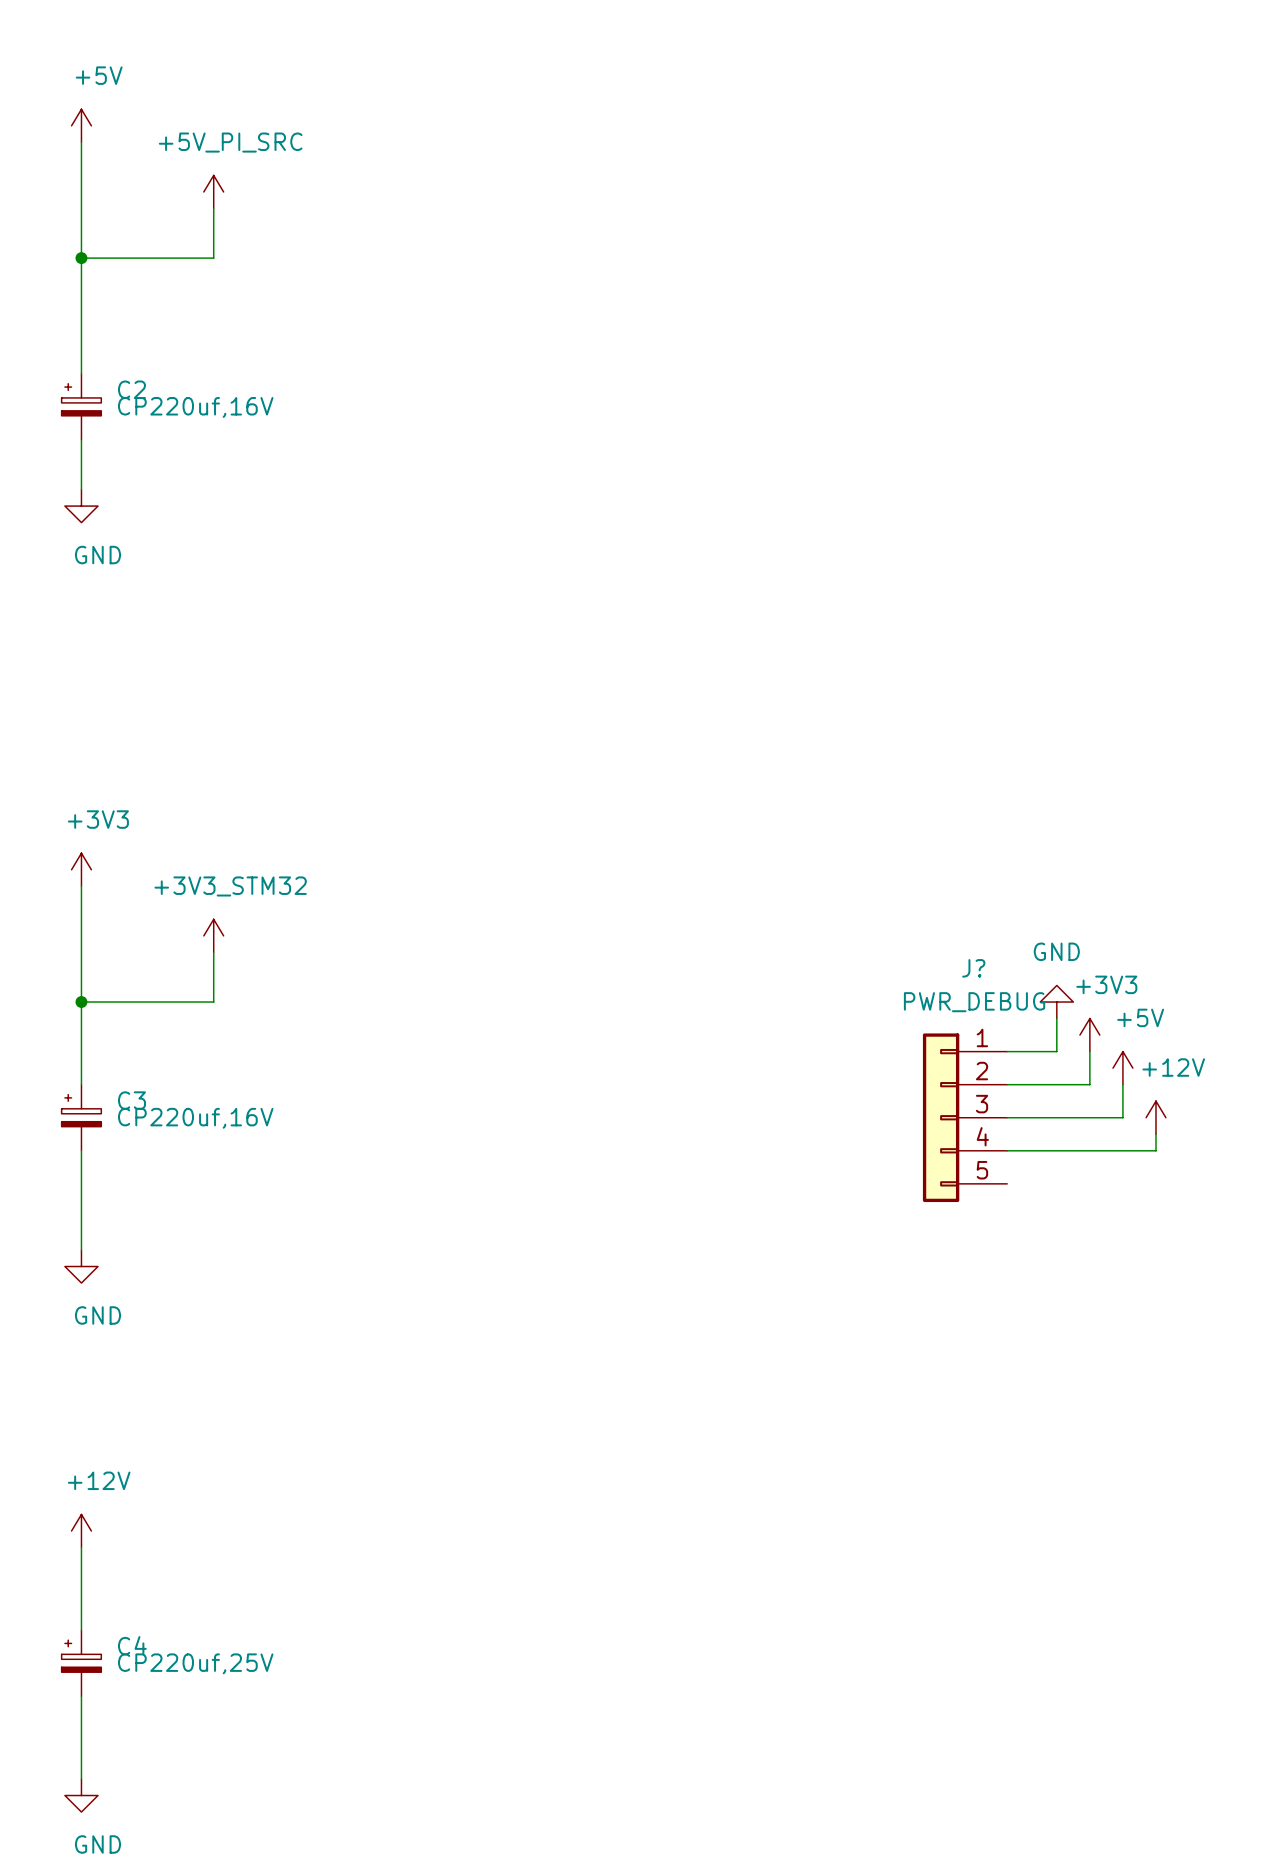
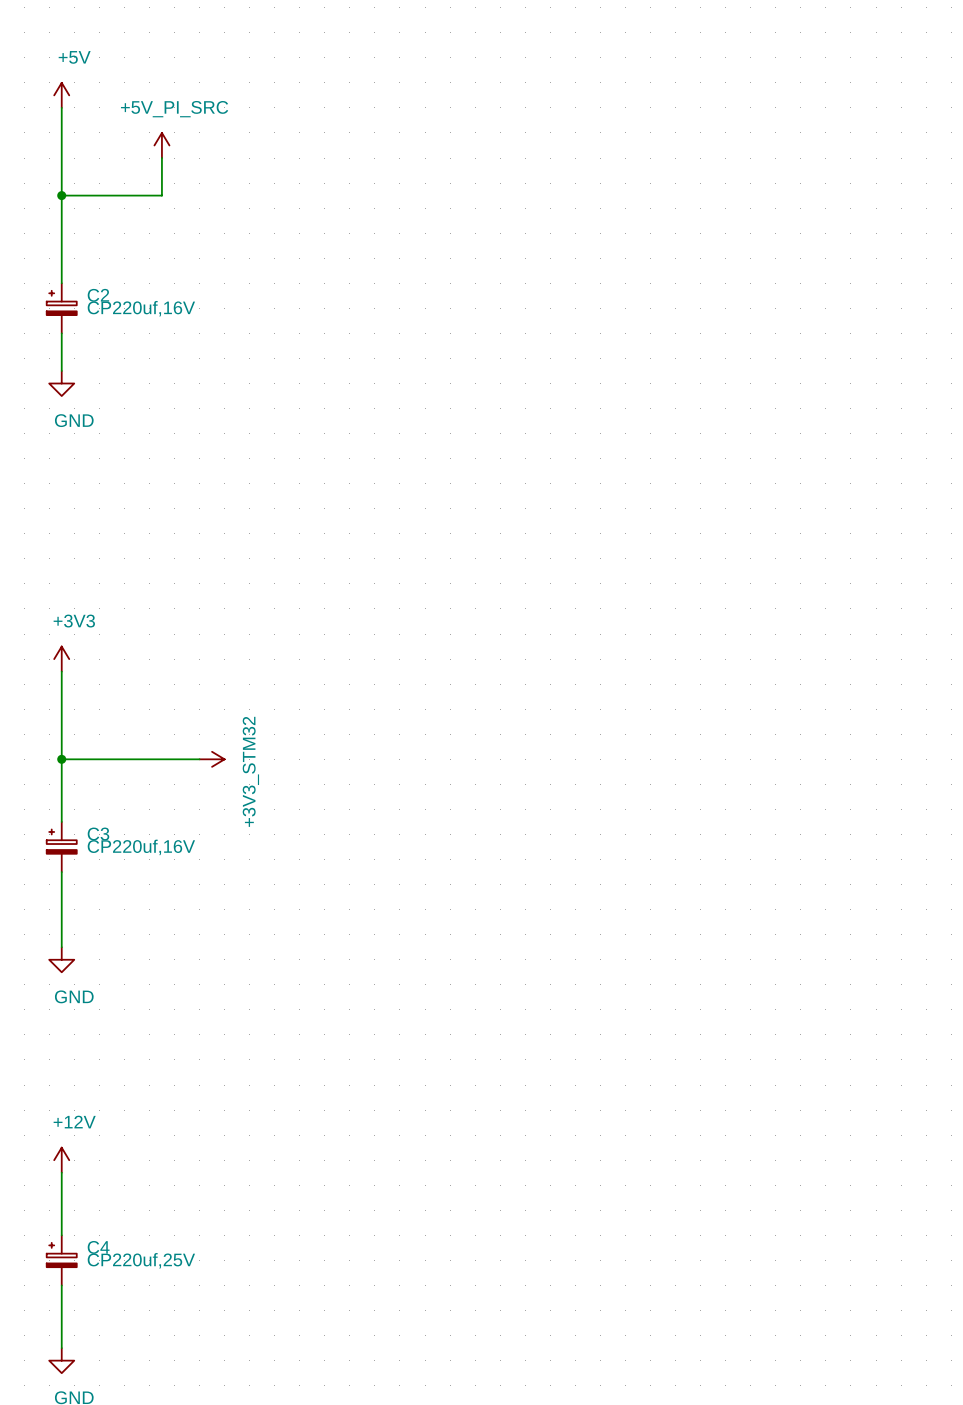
power symbol rotation: 0° (213, 935) -> 90° clockwise (212, 759)
power symbol position: +3V3_STM32 (213, 935) -> +3V3_STM32 (212, 759)
wire: (213, 952) (213, 1002) -> (199, 759) (161, 759)
power symbol: GND (1056, 1002) -> none
wire: (1056, 1018) (1056, 1051) (1007, 1051) -> none
power symbol: +3V3 (1089, 1035) -> none
wire: (1089, 1051) (1089, 1084) (1007, 1084) -> none
power symbol: +5V (1122, 1068) -> none
wire: (1122, 1084) (1122, 1117) (1007, 1117) -> none
J?: PWR_DEBUG (965, 1117) -> none
power symbol: +12V (1156, 1117) -> none
wire: (1156, 1134) (1156, 1150) (1007, 1150) -> none

